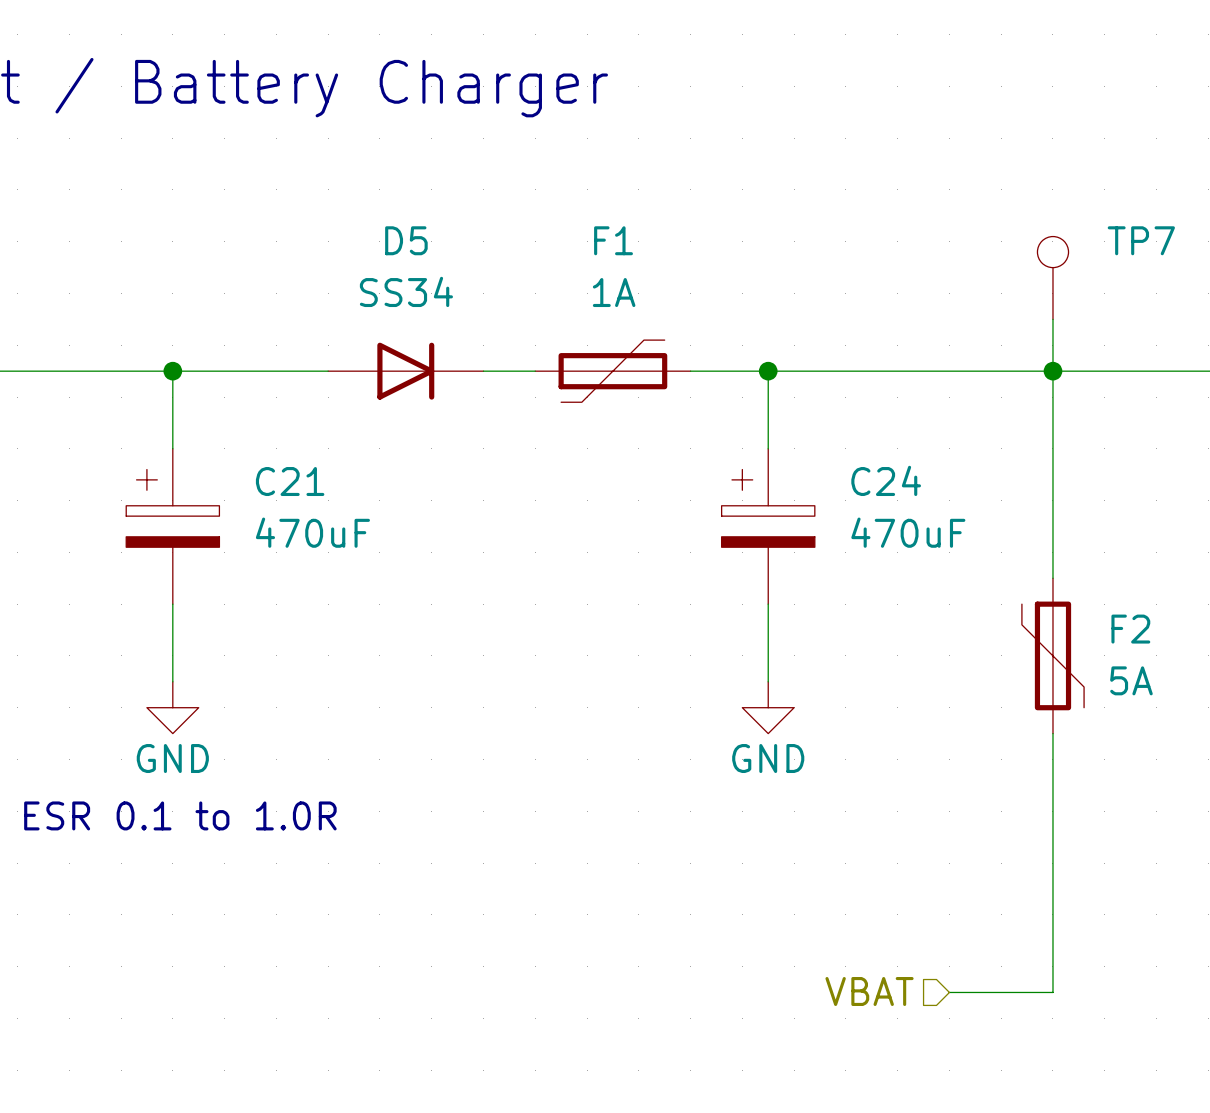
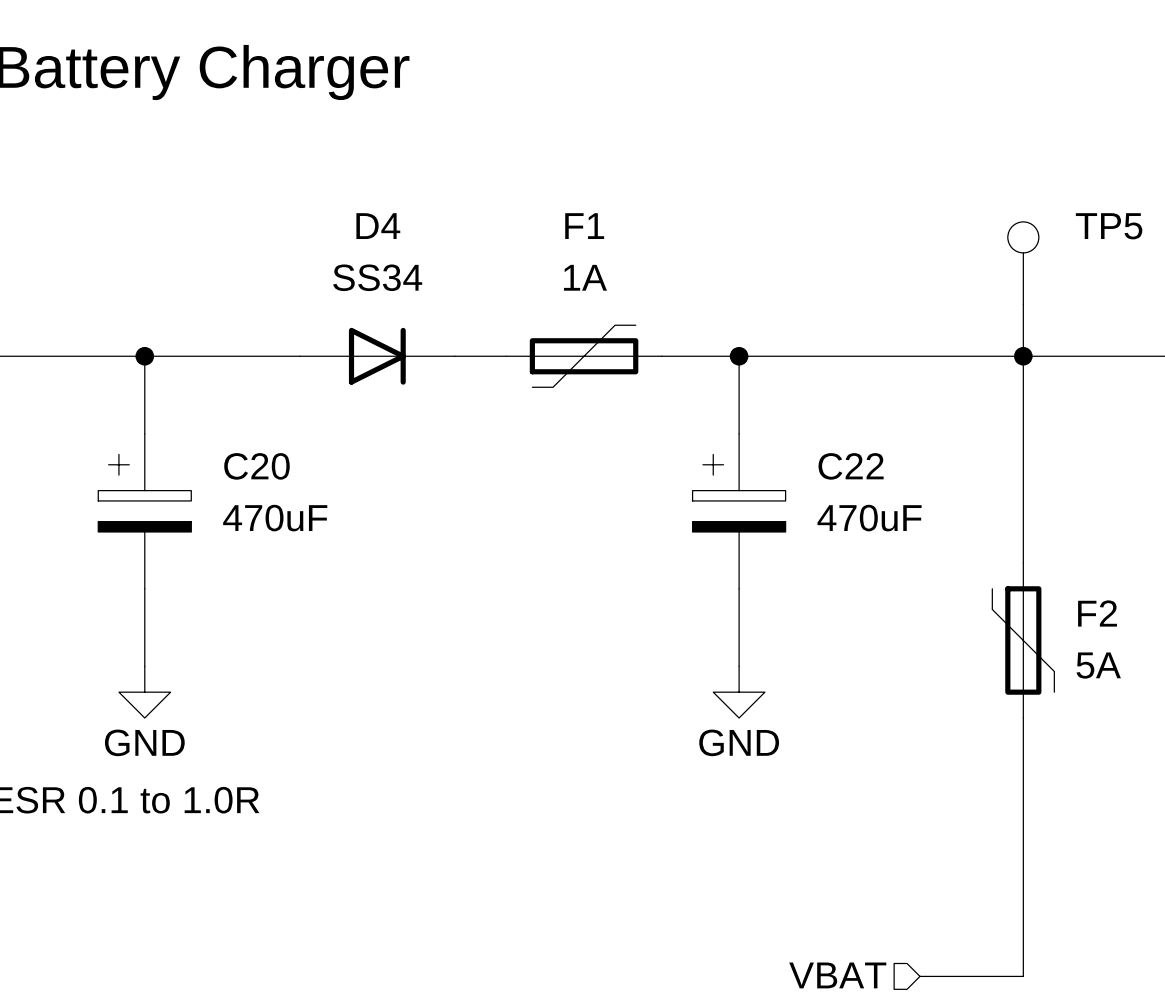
D5 name: D5 (406, 240) -> D4 (378, 226)
TP7 name: TP7 (1141, 240) -> TP5 (1109, 226)
C24 name: C24 (886, 480) -> C22 (851, 466)
C21 name: C21 (290, 481) -> C20 (256, 466)

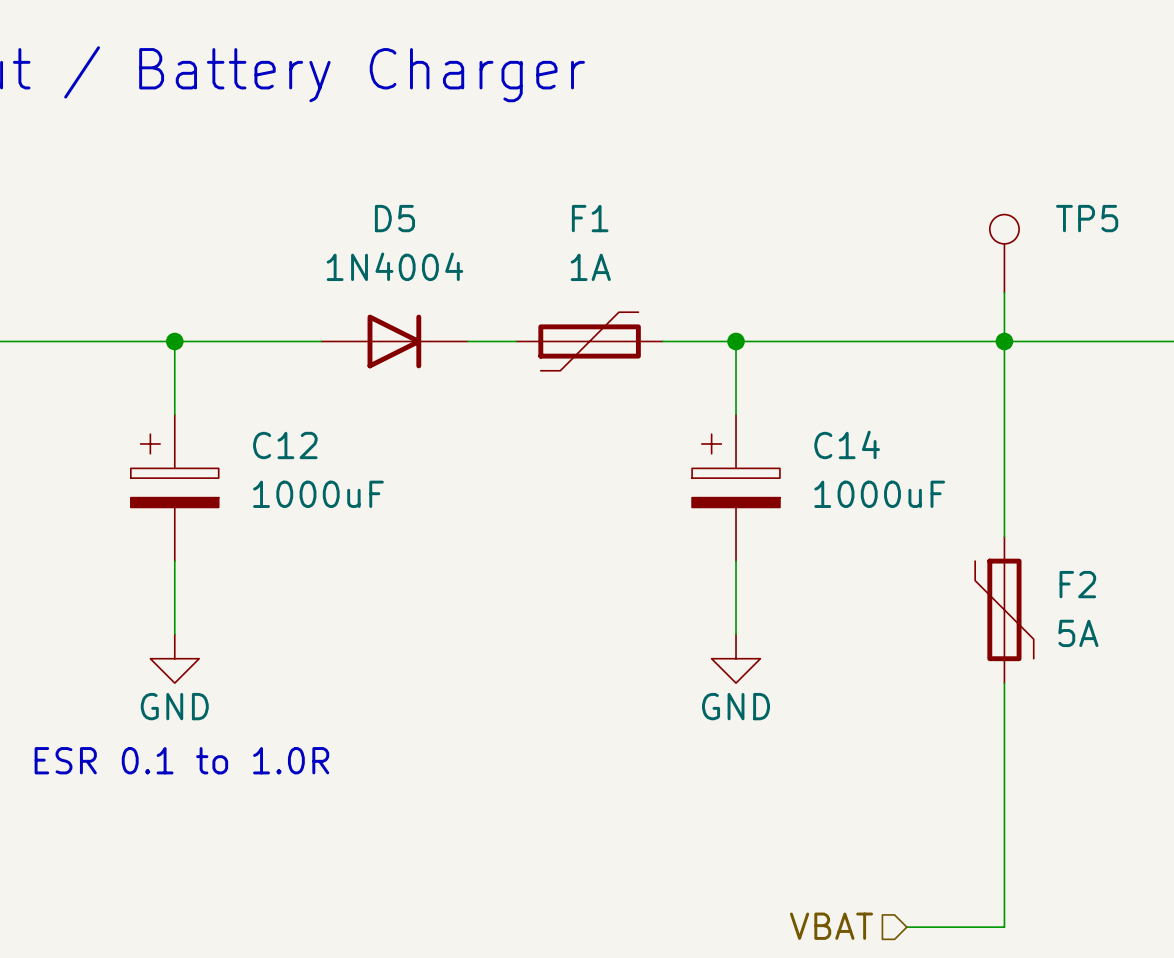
D4 name: D4 (378, 226) -> D5 (394, 218)
D4 value: SS34 (377, 277) -> 1N4004 (394, 266)
C20 name: C20 (256, 466) -> C12 (285, 445)
C22 name: C22 (851, 466) -> C14 (847, 444)
C20 value: 470uF (275, 518) -> 1000uF (318, 494)
C22 value: 470uF (869, 518) -> 1000uF (879, 494)

